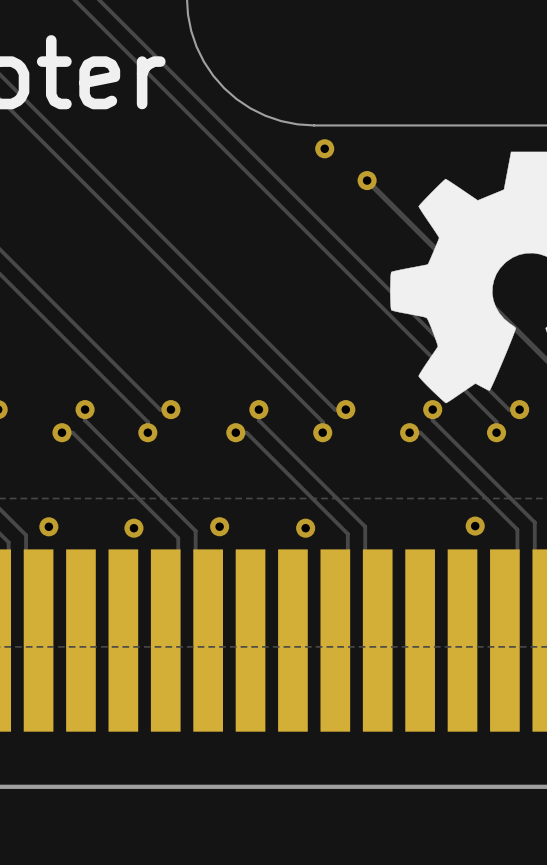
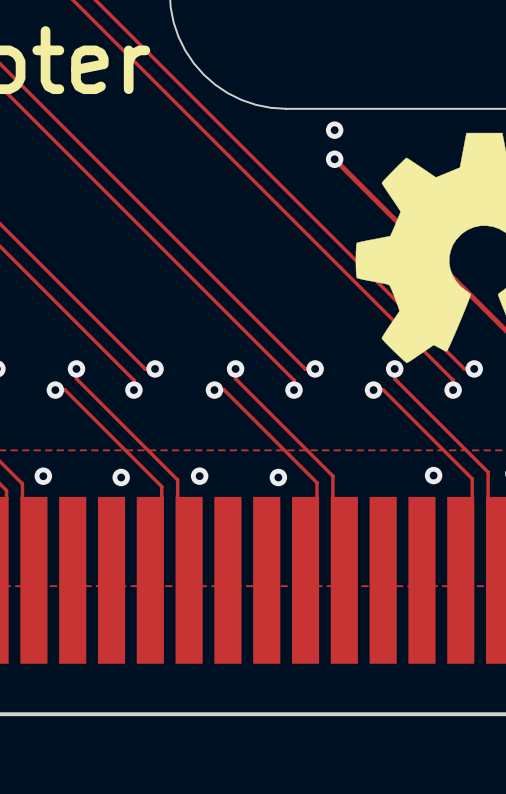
via position: (324, 148) -> (334, 130)

